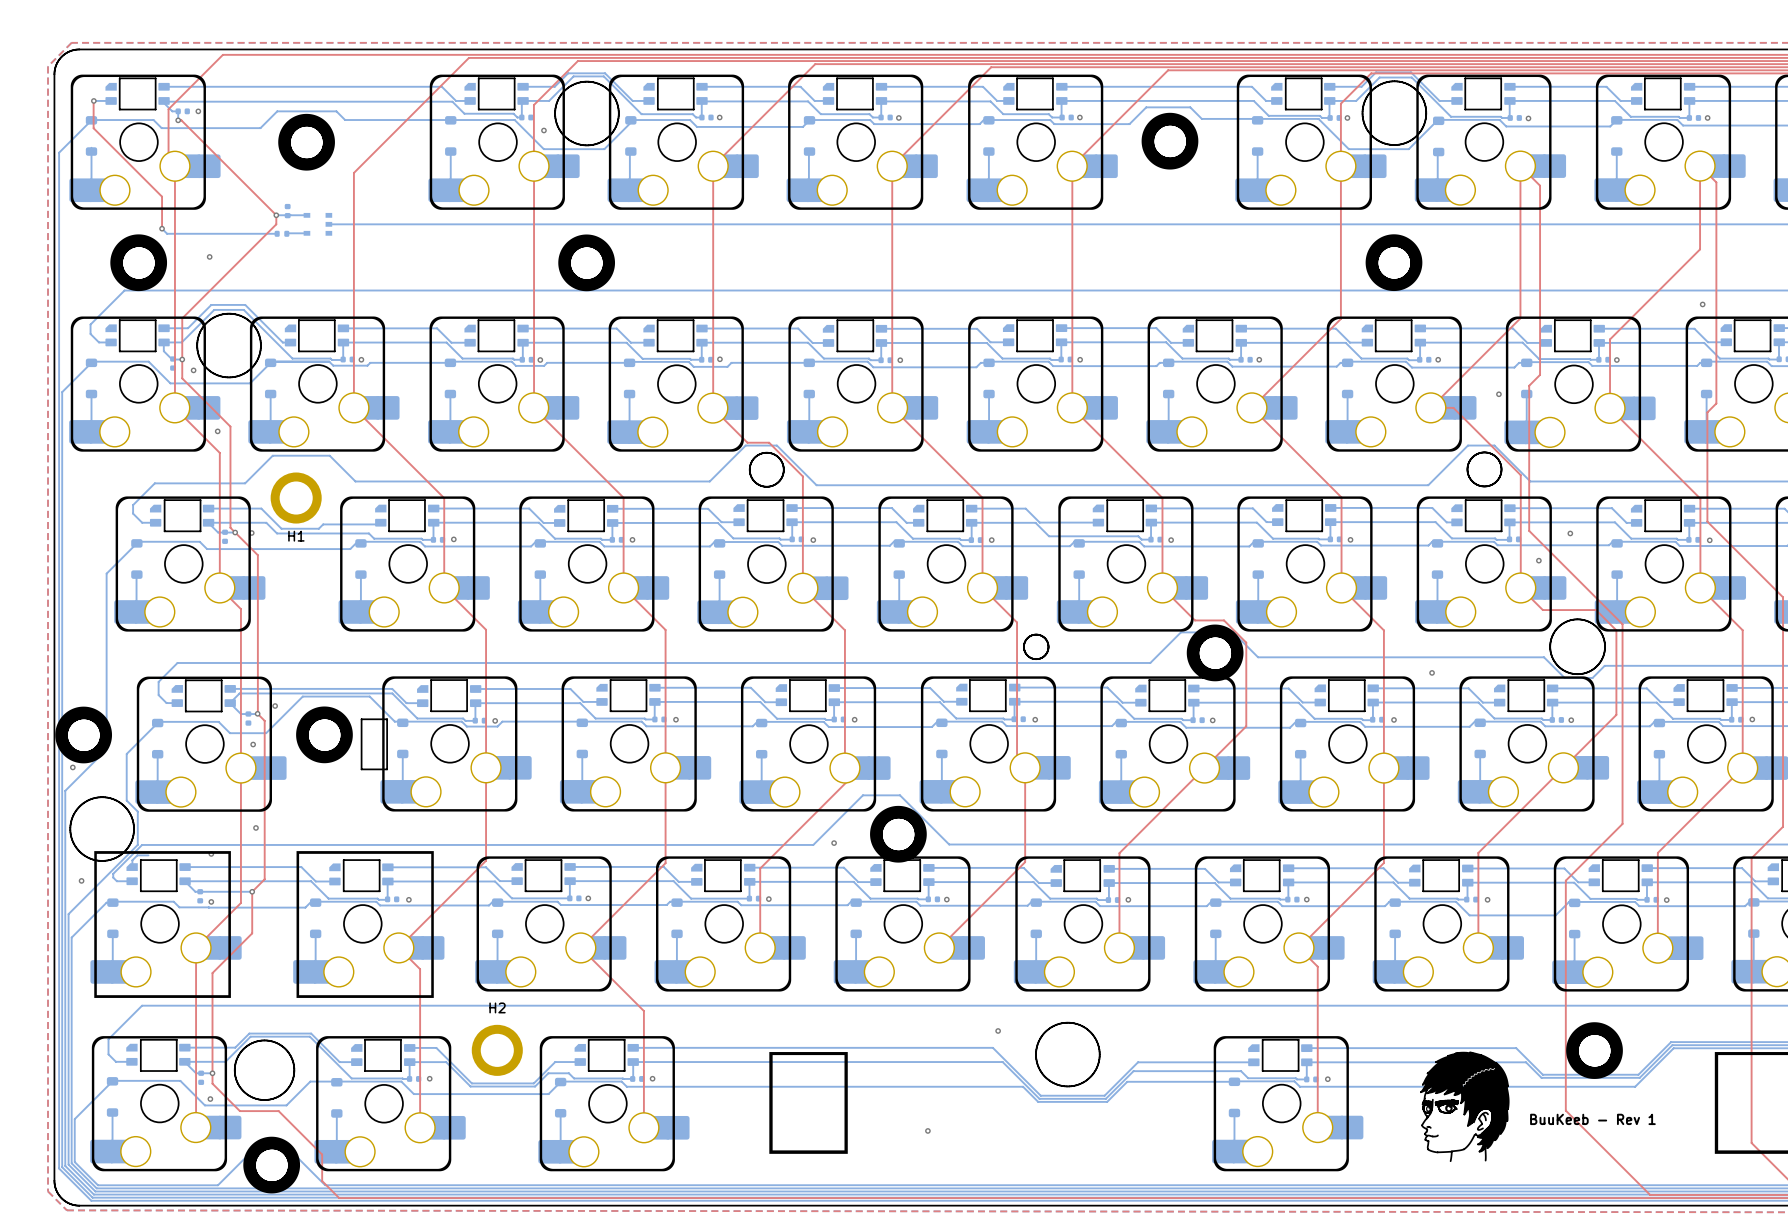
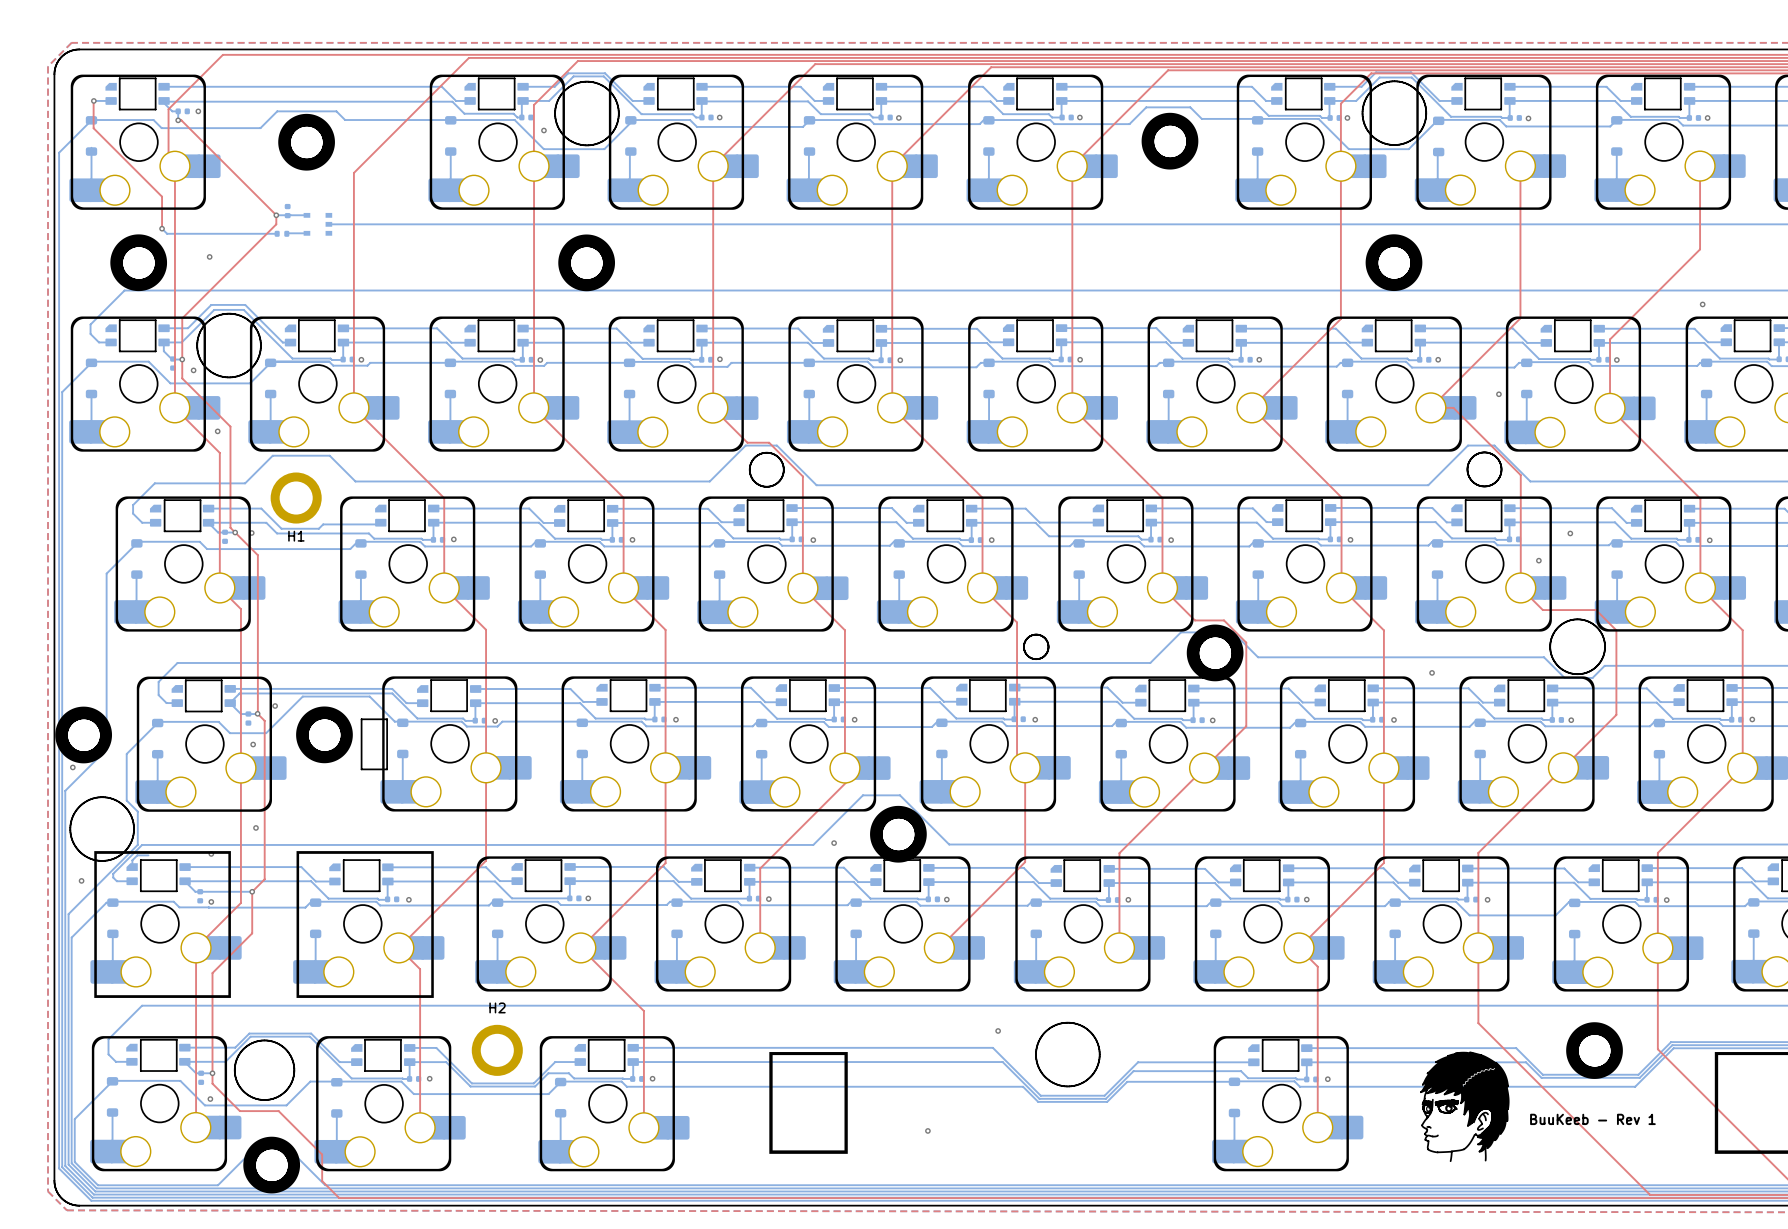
top track: (1520, 166) (1540, 185) (1540, 374) (1529, 385) (1529, 530) (1622, 624) (1622, 823) (1565, 880) (1565, 1110) -> (1478, 947) (1478, 1023) (1565, 1110)
top track: (1700, 166) (1716, 182) (1716, 403) (1707, 412) (1707, 521) (1783, 597) (1783, 826) (1751, 858) (1751, 1143) -> (1657, 948) (1657, 1049) (1751, 1143)

